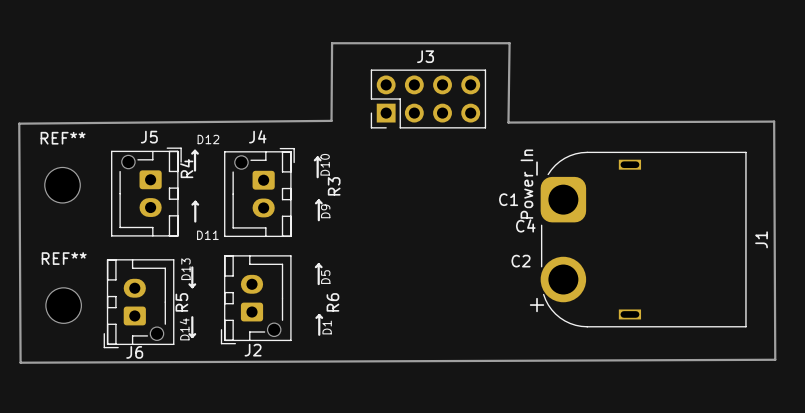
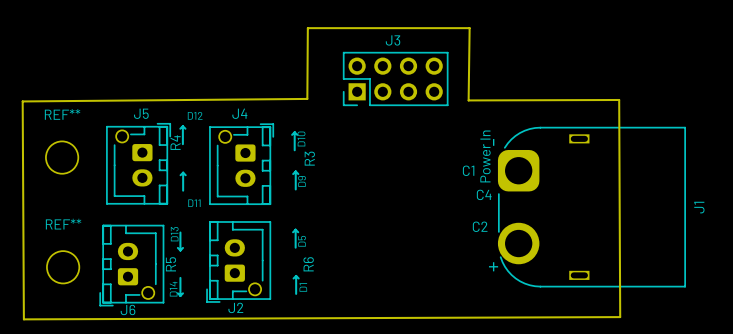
board edge: (508, 122) (774, 121) (775, 359) (20, 362) -> (468, 100) (619, 99) (620, 317) (23, 319)

